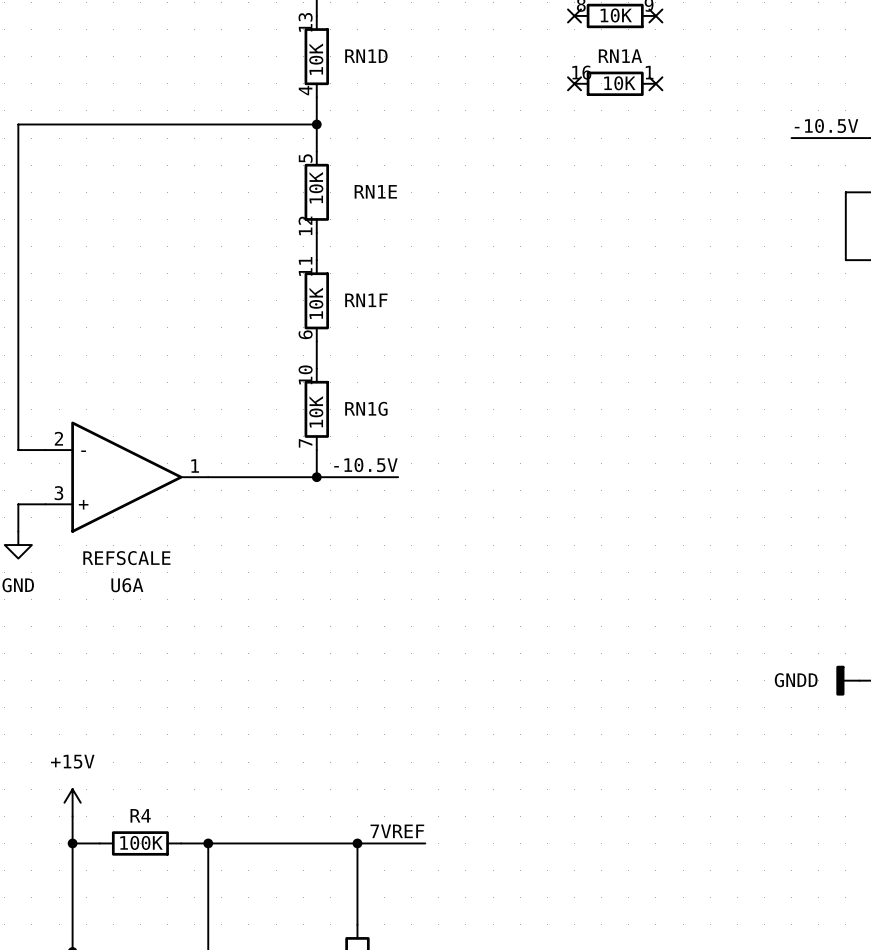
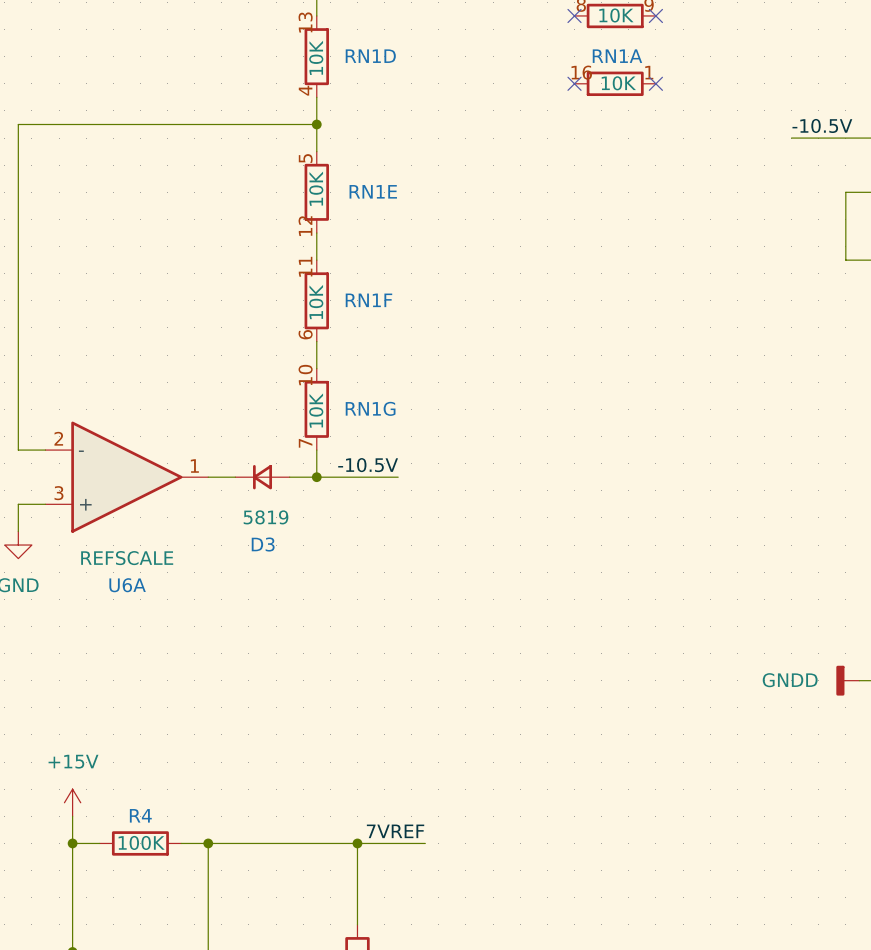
D3: none -> 5819 (262, 477)

